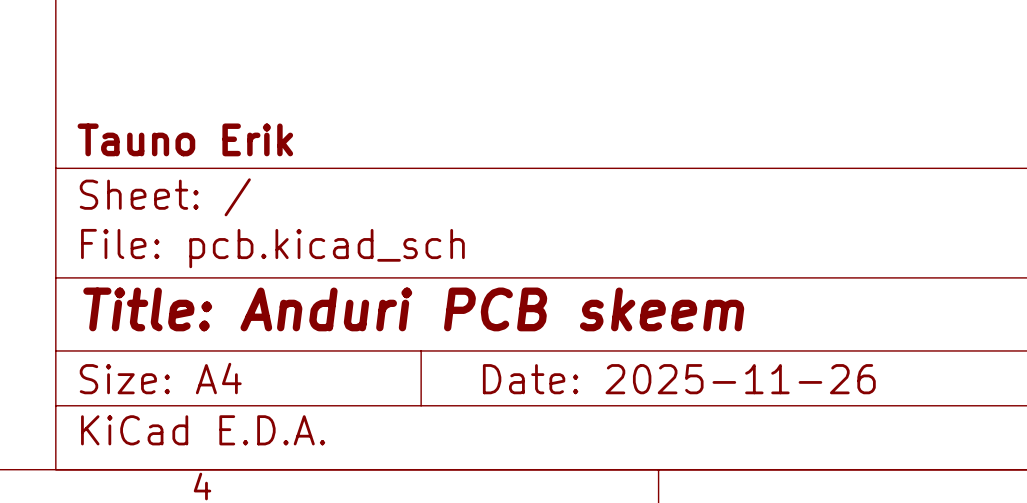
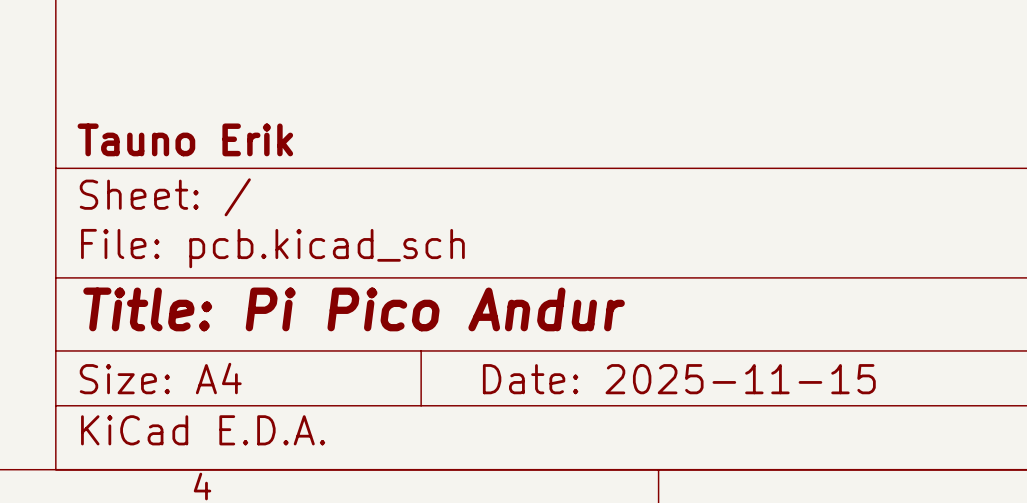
title block: Title: Anduri PCB skeem (413, 309) -> Title: Pi Pico Andur (354, 309)
title block: Date: 2025-11-26 (679, 379) -> Date: 2025-11-15 (679, 379)

